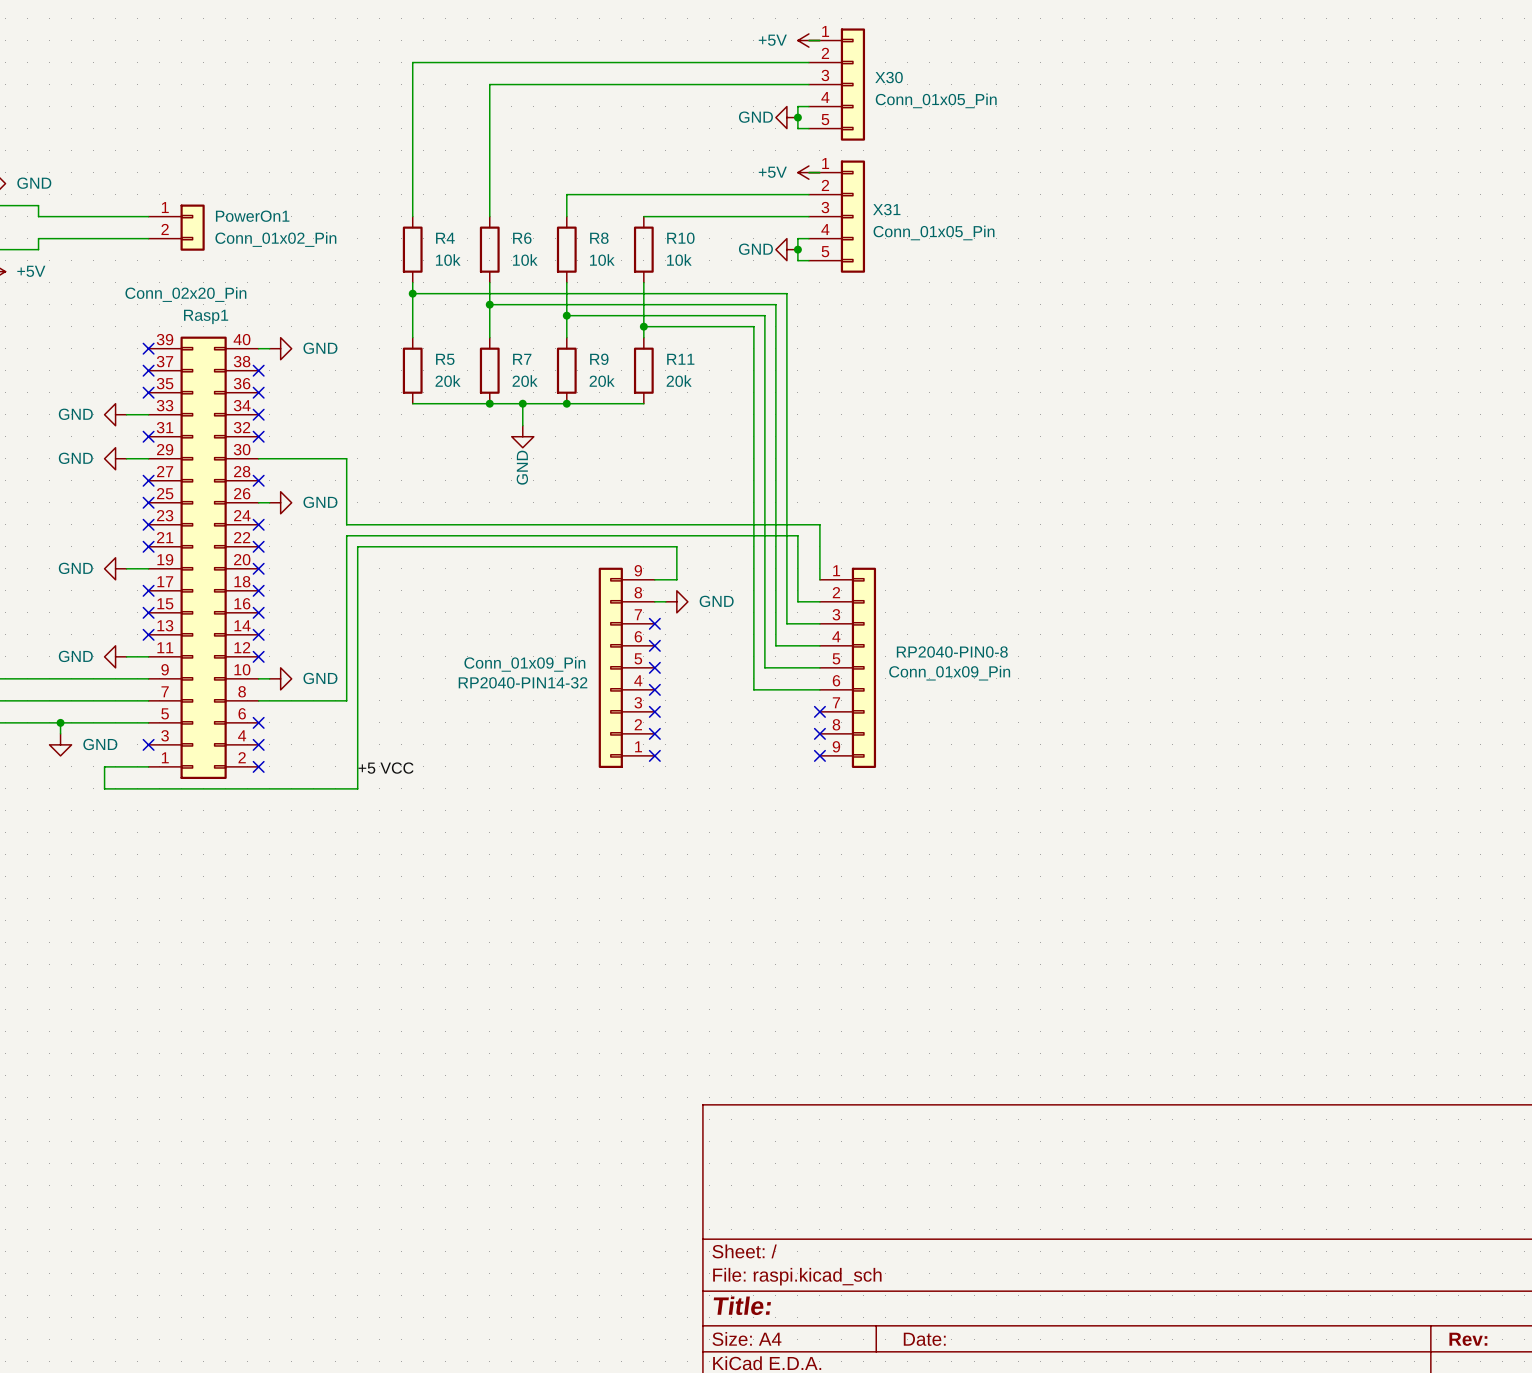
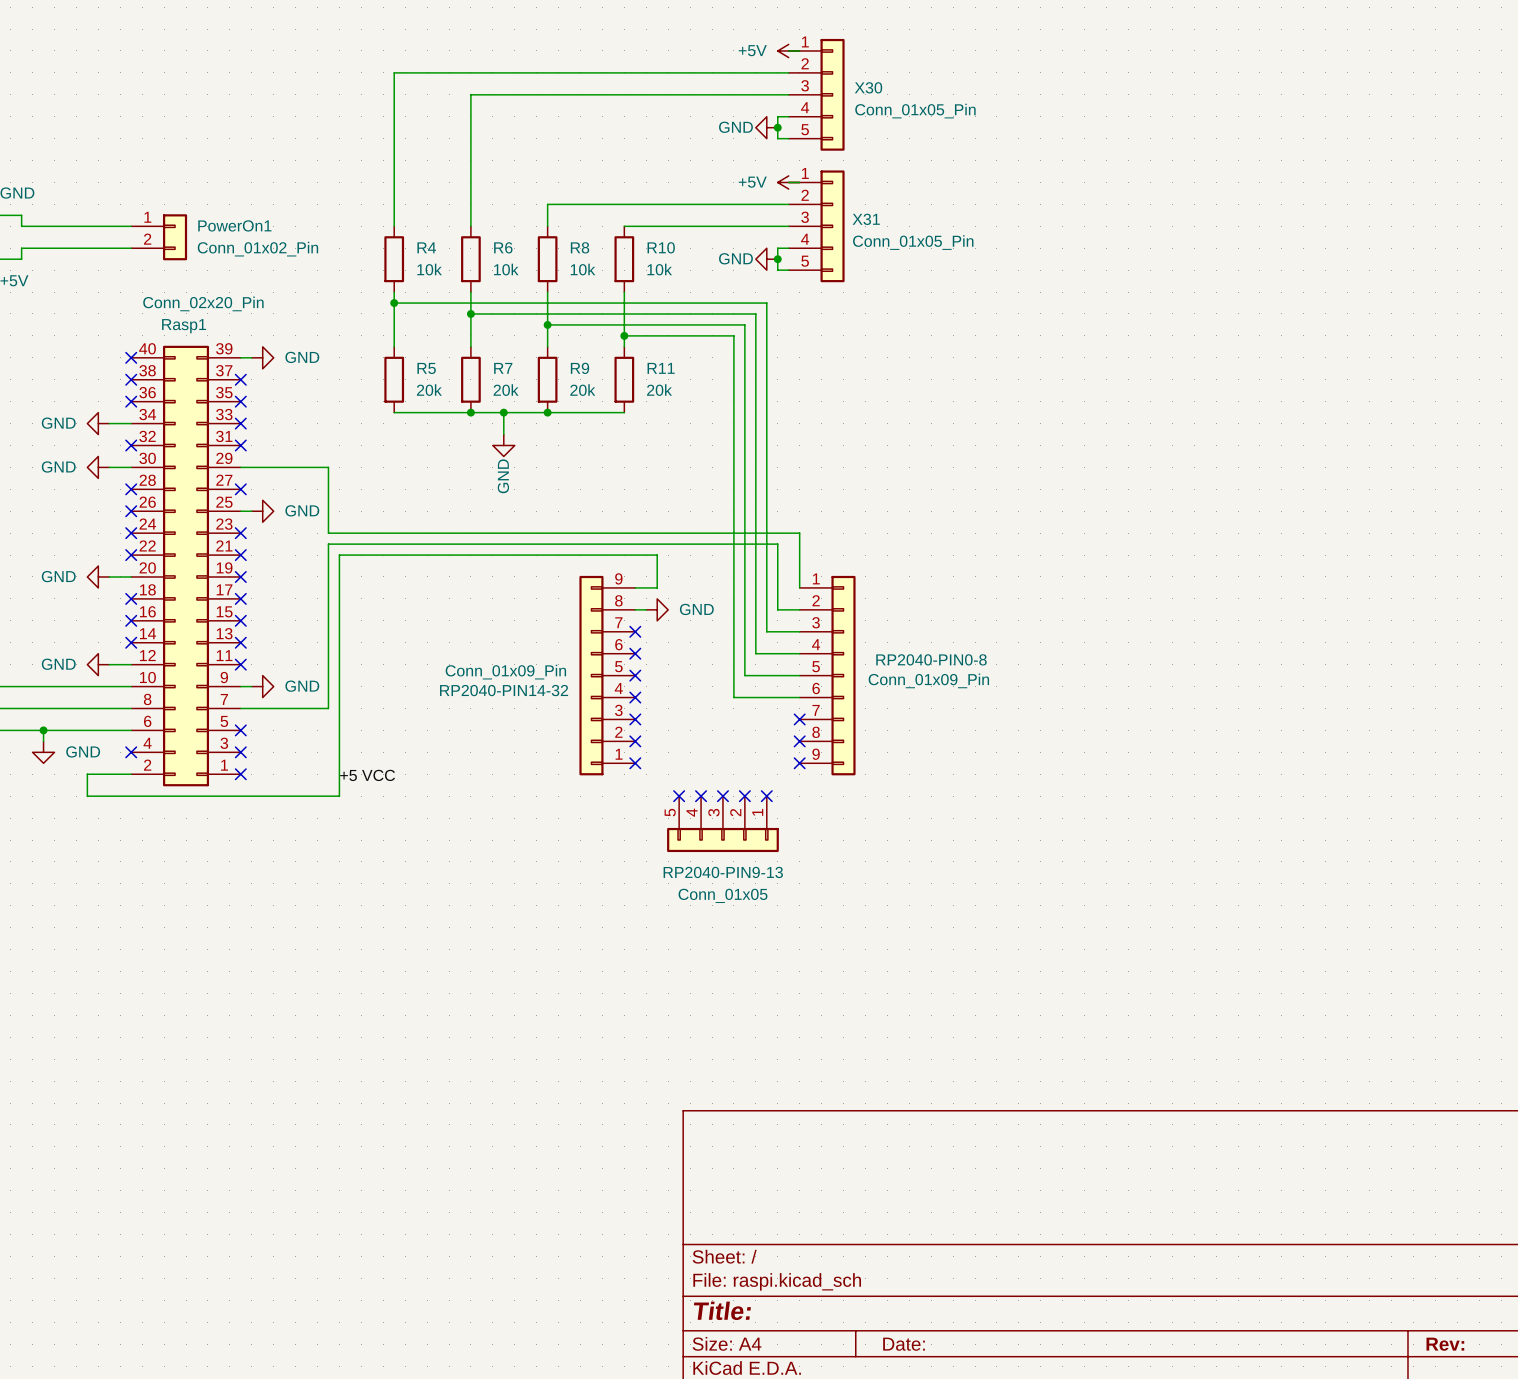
Rasp1 flip: as is (203, 557) -> left-right (186, 566)
no-connect mark: none -> (679, 796)
no-connect mark: none -> (701, 796)
no-connect mark: none -> (722, 796)
no-connect mark: none -> (744, 796)
no-connect mark: none -> (766, 796)
RP2040-PIN9-13: none -> Conn_01x05 (722, 824)

